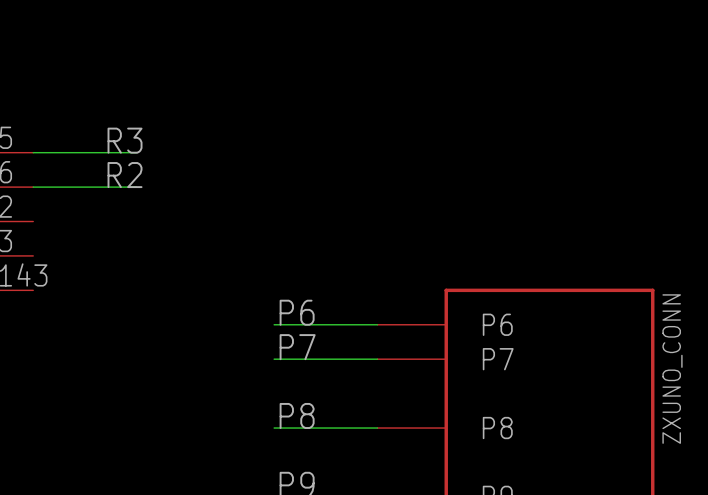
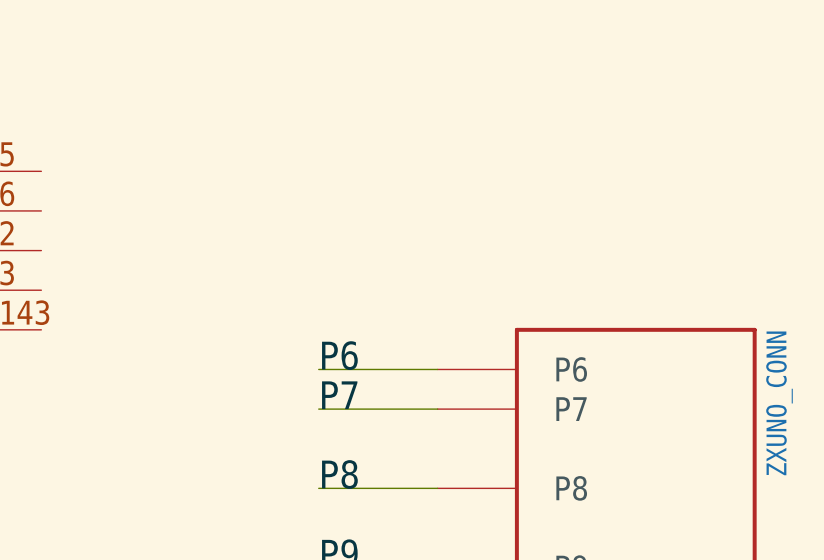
label: R3 (125, 140) -> none
wire: (33, 152) (136, 152) -> none
label: R2 (125, 175) -> none
wire: (33, 187) (136, 187) -> none

